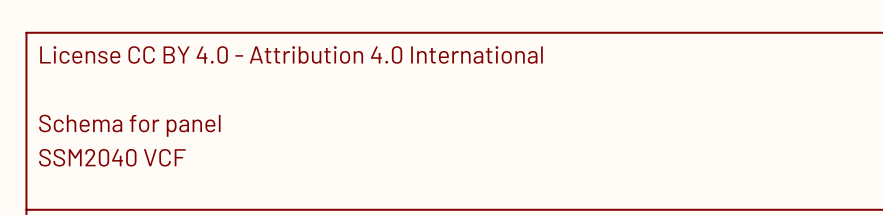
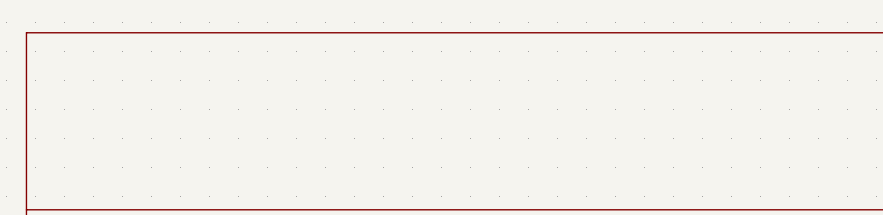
title block: License CC BY 4.0 - Attribution 4.0 International (291, 54) -> none
title block: Schema for panel (129, 125) -> none
title block: SSM2040 VCF (112, 157) -> none

